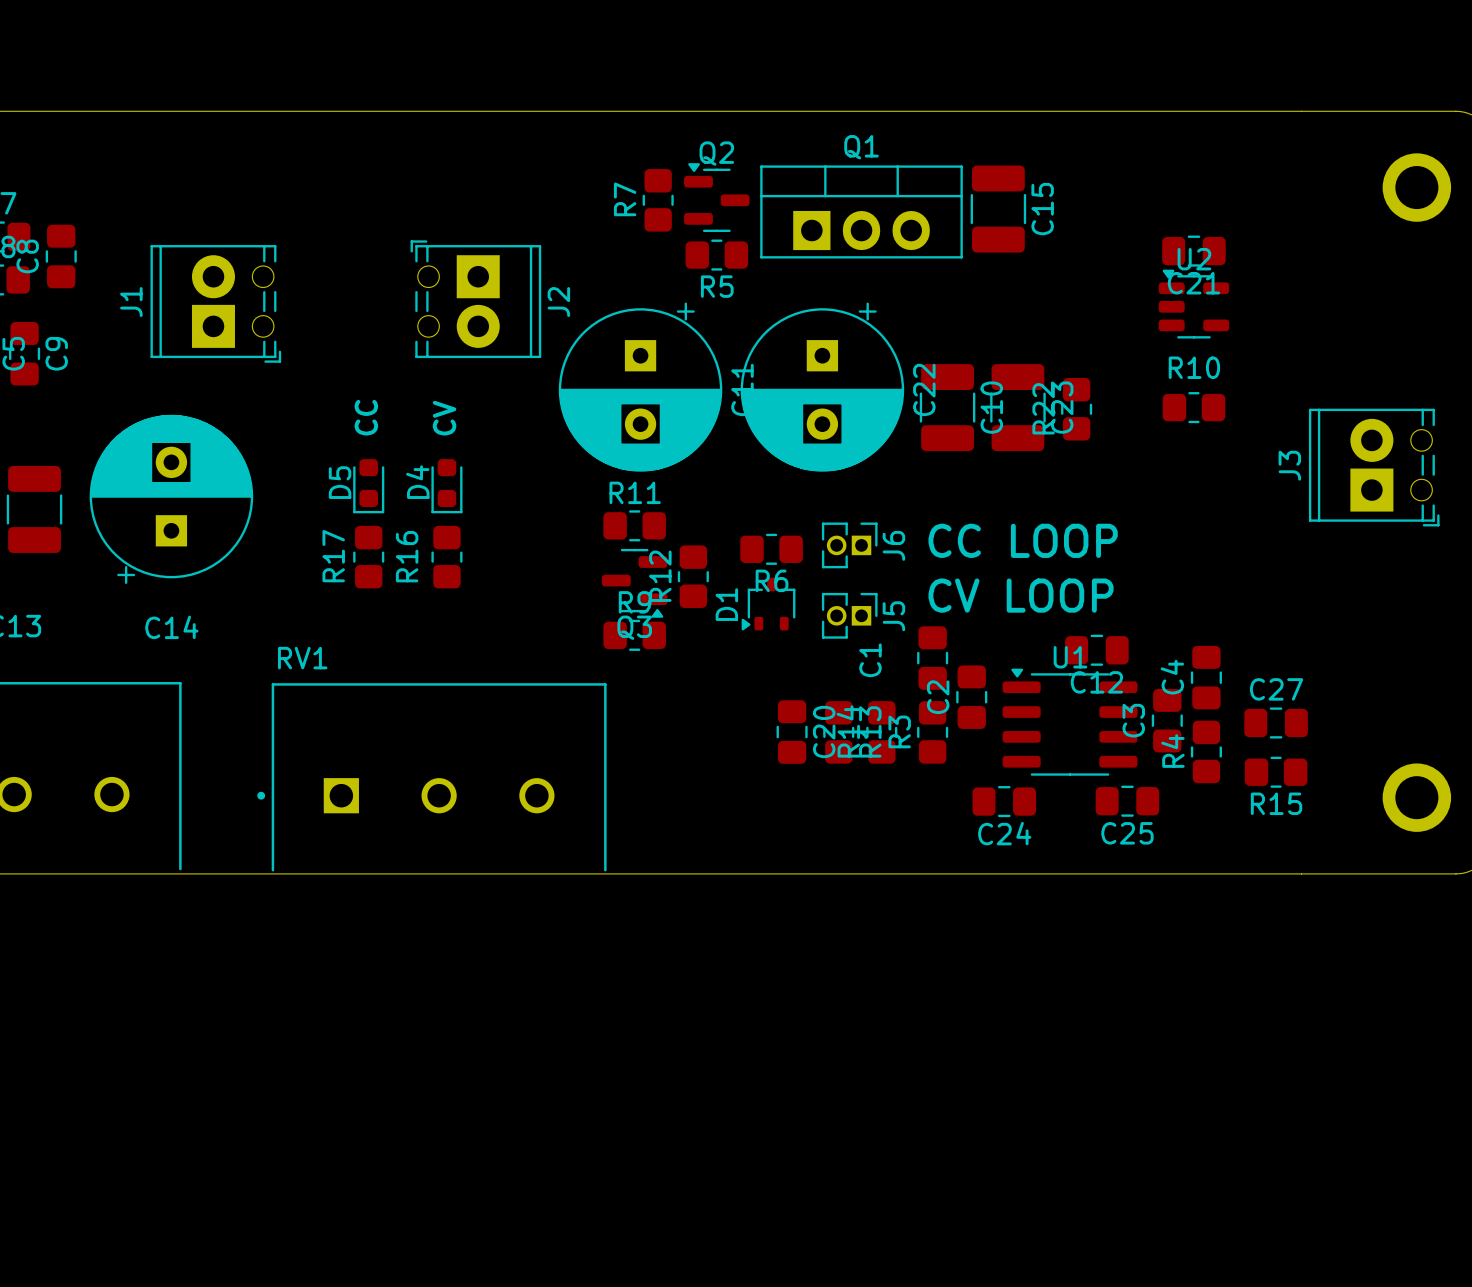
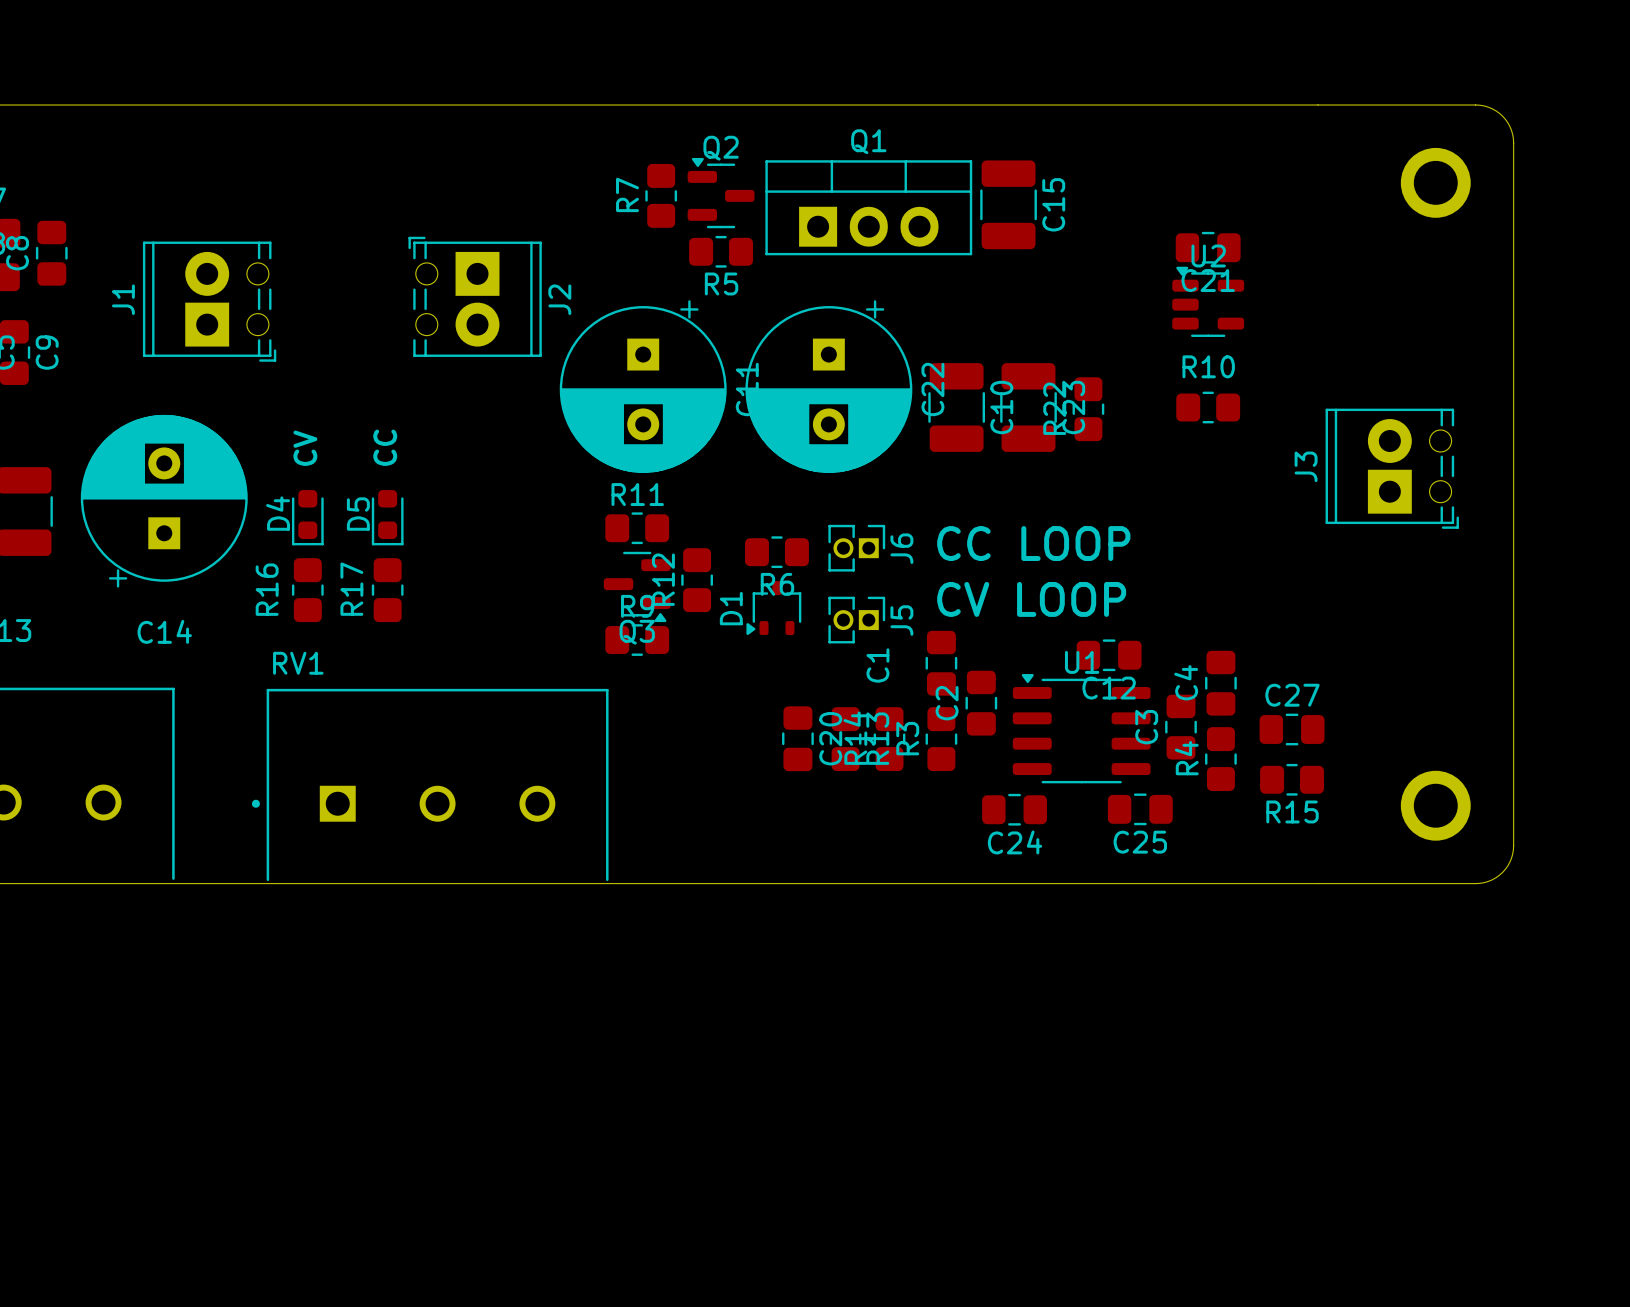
text position: CC (366, 417) -> CC (385, 447)
text position: CV (444, 418) -> CV (305, 448)
D5 position: (368, 486) -> (387, 517)
D4 position: (446, 486) -> (307, 517)
R17 position: (368, 557) -> (387, 590)
R16 position: (446, 557) -> (307, 590)

